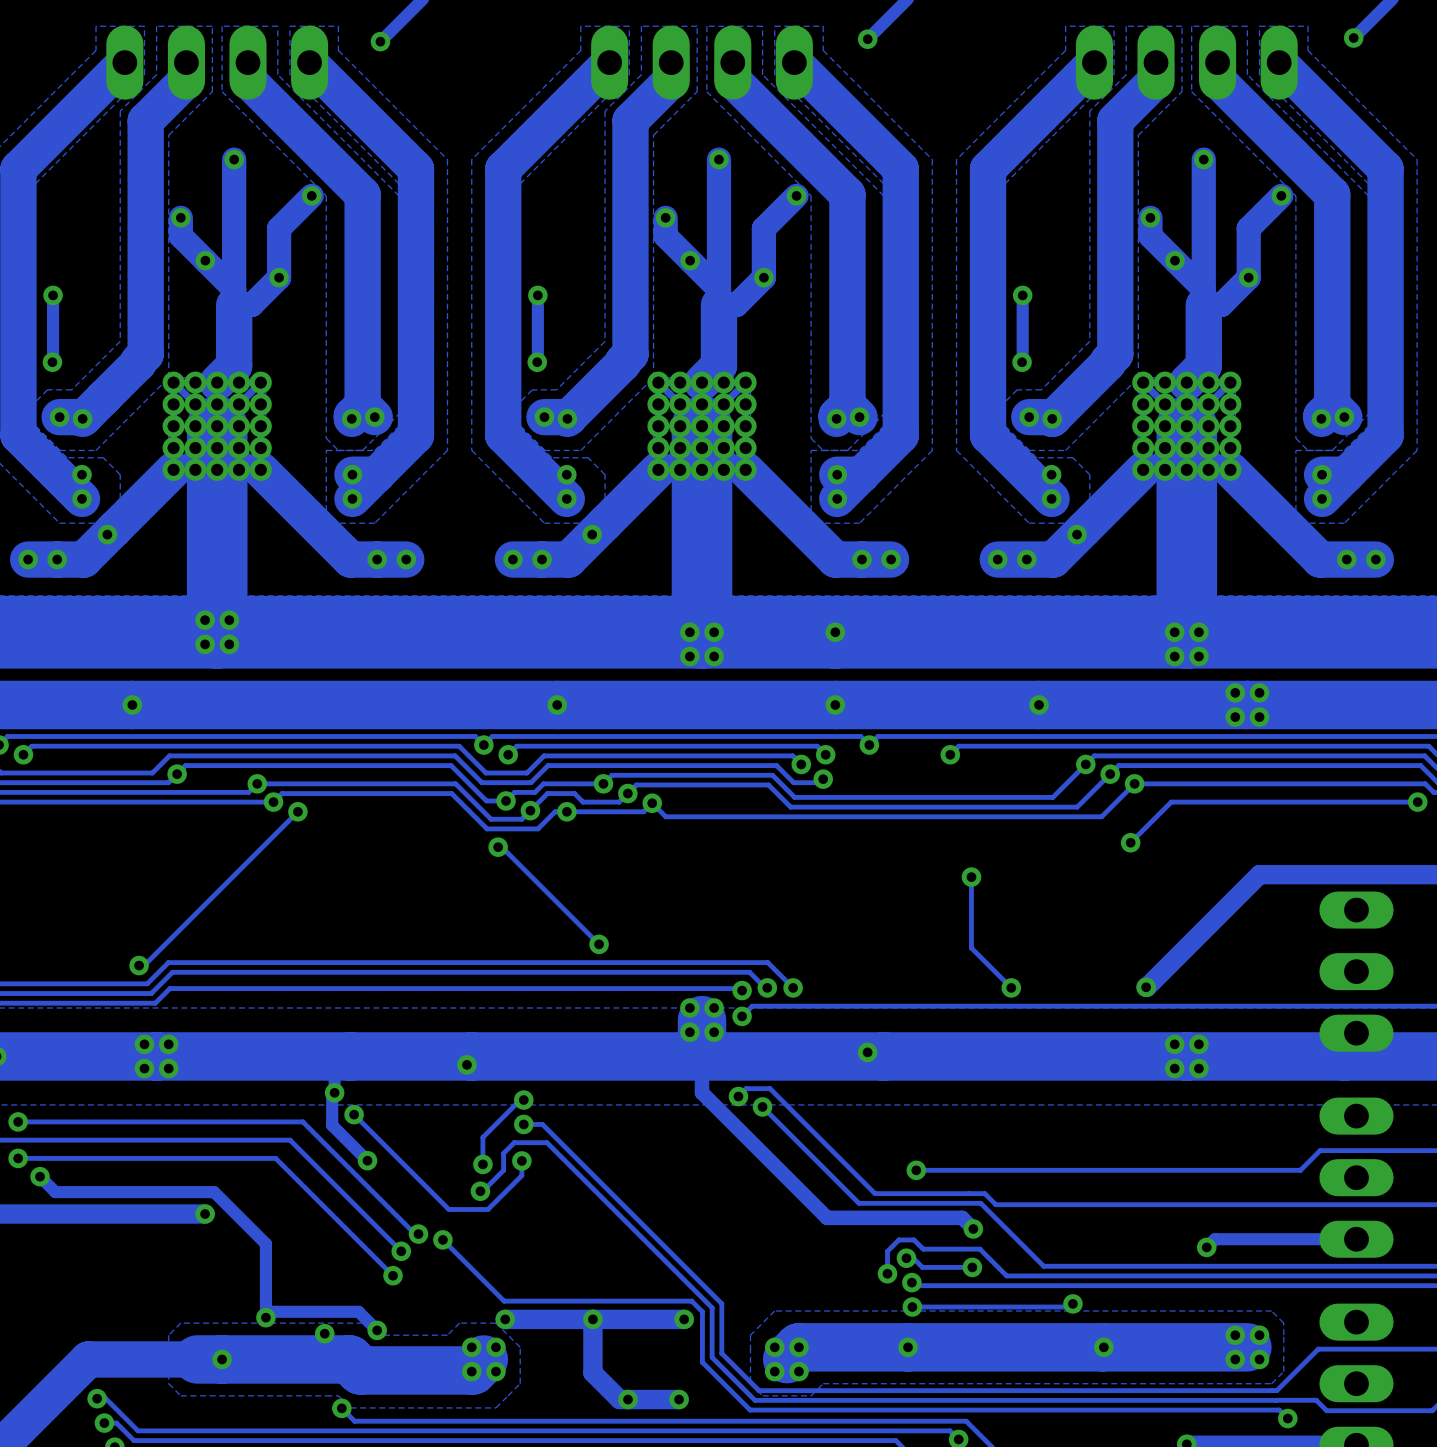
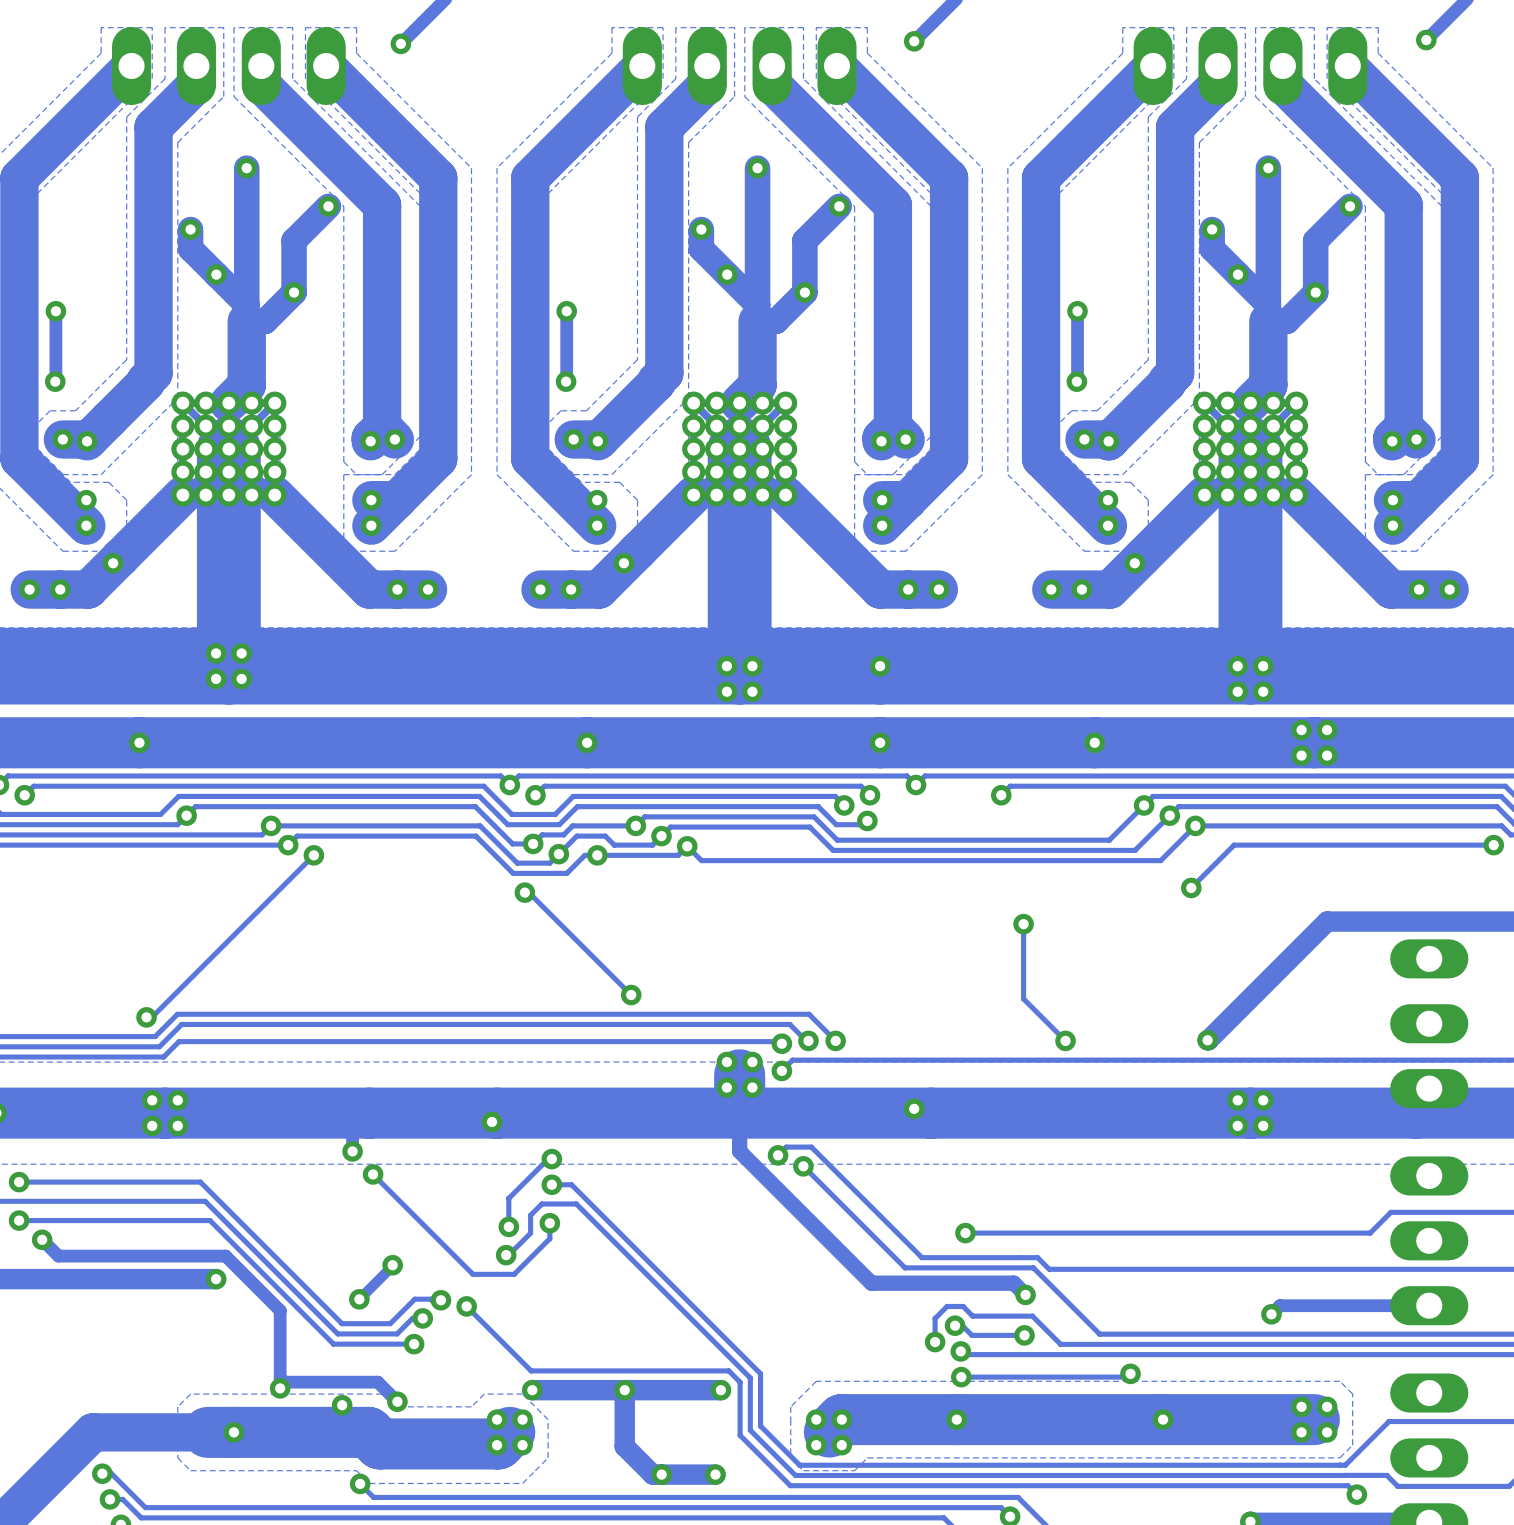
track: (334, 1092) (332, 1095) (332, 1125) (367, 1160) -> none
track: (190, 1121) (302, 1121) (415, 1234) -> (200, 1182) (342, 1323) (390, 1323) (414, 1299) (437, 1300)
track: (194, 1140) (290, 1140) (401, 1251) -> (205, 1201) (337, 1333) (397, 1333) (412, 1318) (422, 1318)
track: (199, 1158) (275, 1158) (393, 1275) -> (210, 1220) (333, 1344) (414, 1344)
via: (367, 1160) -> none
track: none -> (392, 1265) (359, 1299)
via: none -> (392, 1265)
via: none -> (359, 1299)

